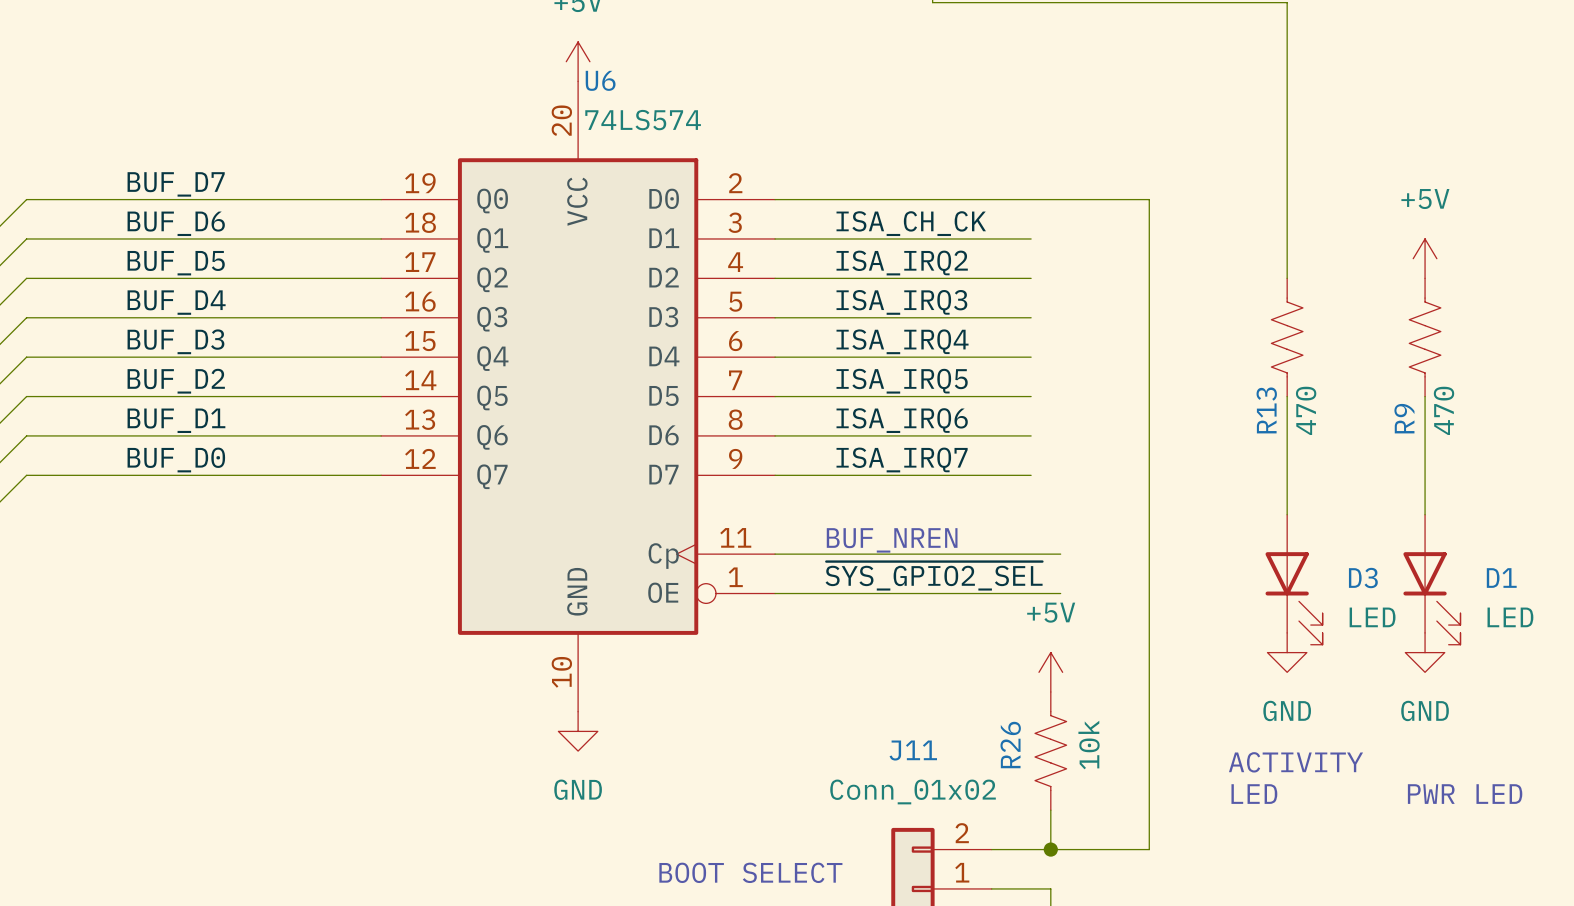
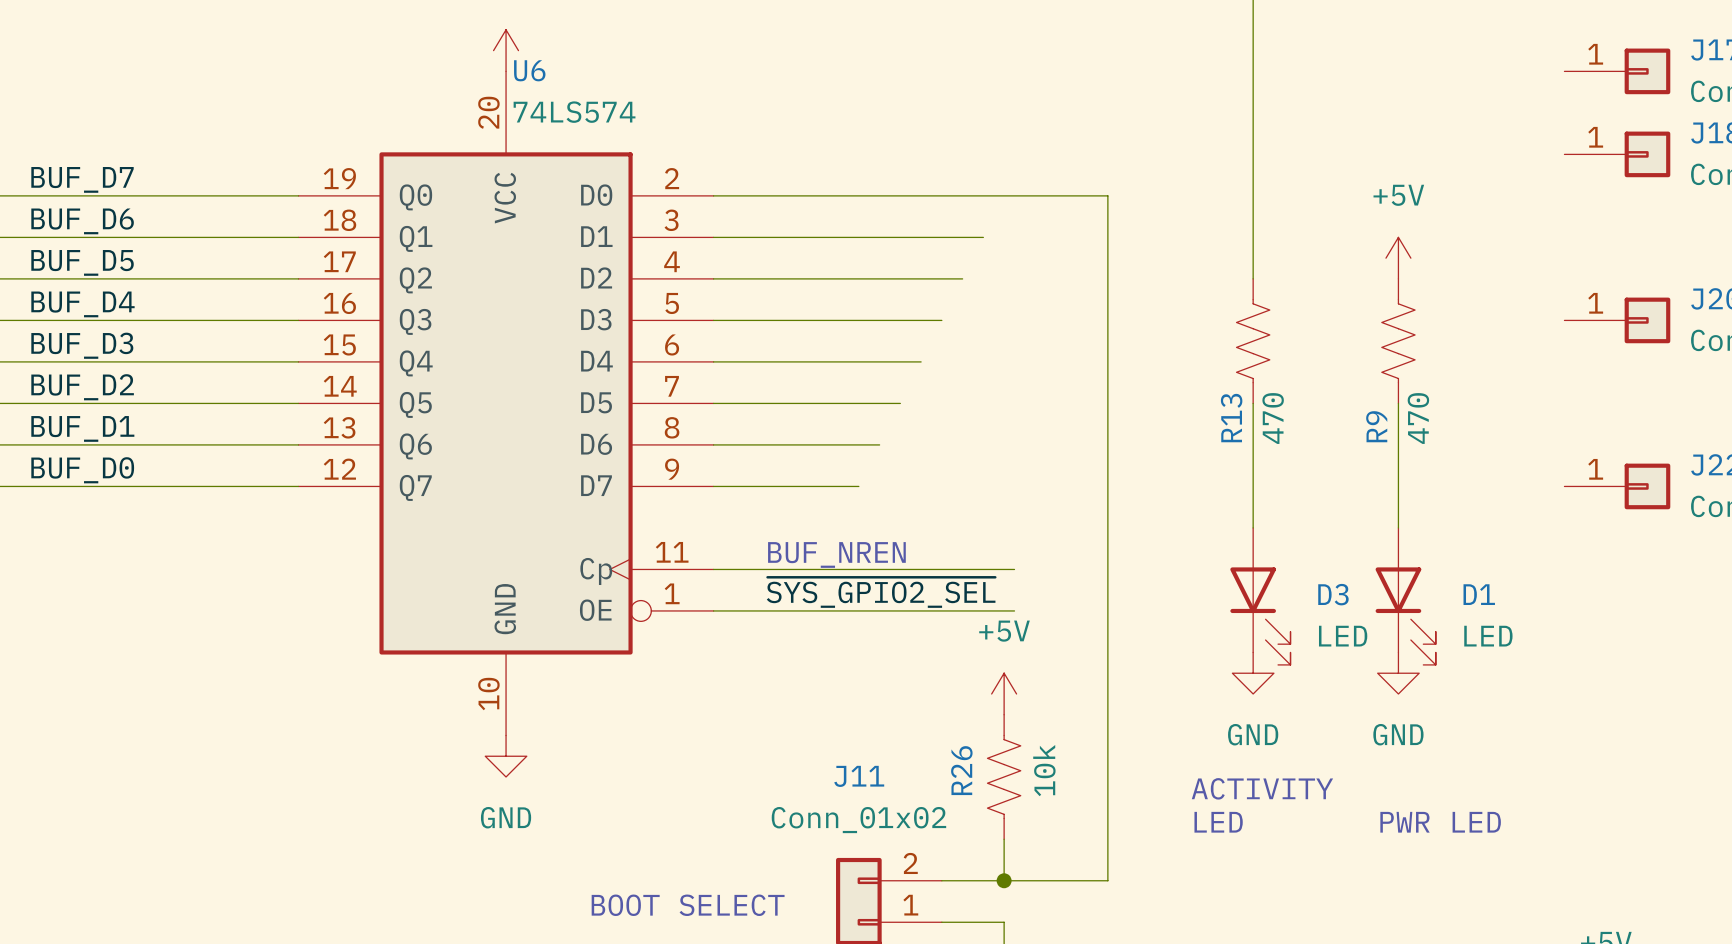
label: ISA_CH_CK (911, 223) -> none
label: ISA_IRQ2 (902, 263) -> none
wire: (1011, 278) (1031, 278) -> none
label: ISA_IRQ3 (901, 302) -> none
wire: (991, 317) (1031, 317) -> none
label: ISA_IRQ4 (902, 341) -> none
wire: (972, 357) (1031, 357) -> none
label: ISA_IRQ5 (902, 381) -> none
wire: (952, 396) (1031, 396) -> none
label: ISA_IRQ6 (902, 420) -> none
wire: (932, 435) (1031, 435) -> none
label: ISA_IRQ7 (902, 459) -> none
wire: (912, 475) (1031, 475) -> none

